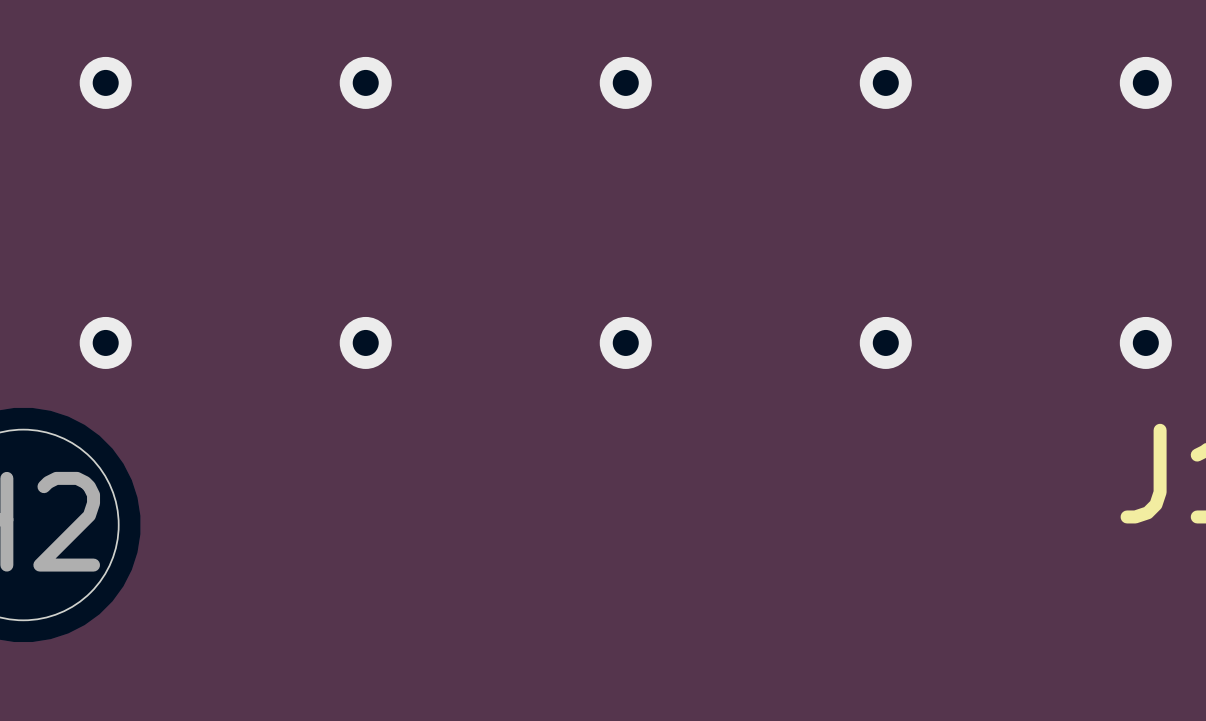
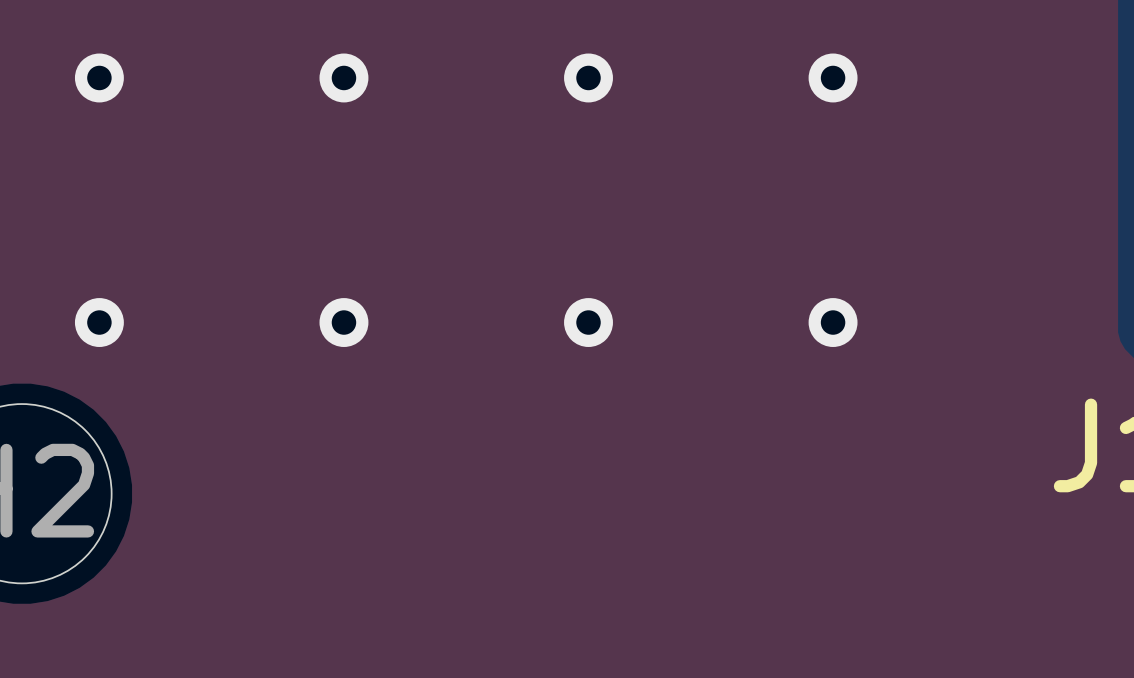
via: (1145, 82) -> none
via: (1145, 342) -> none

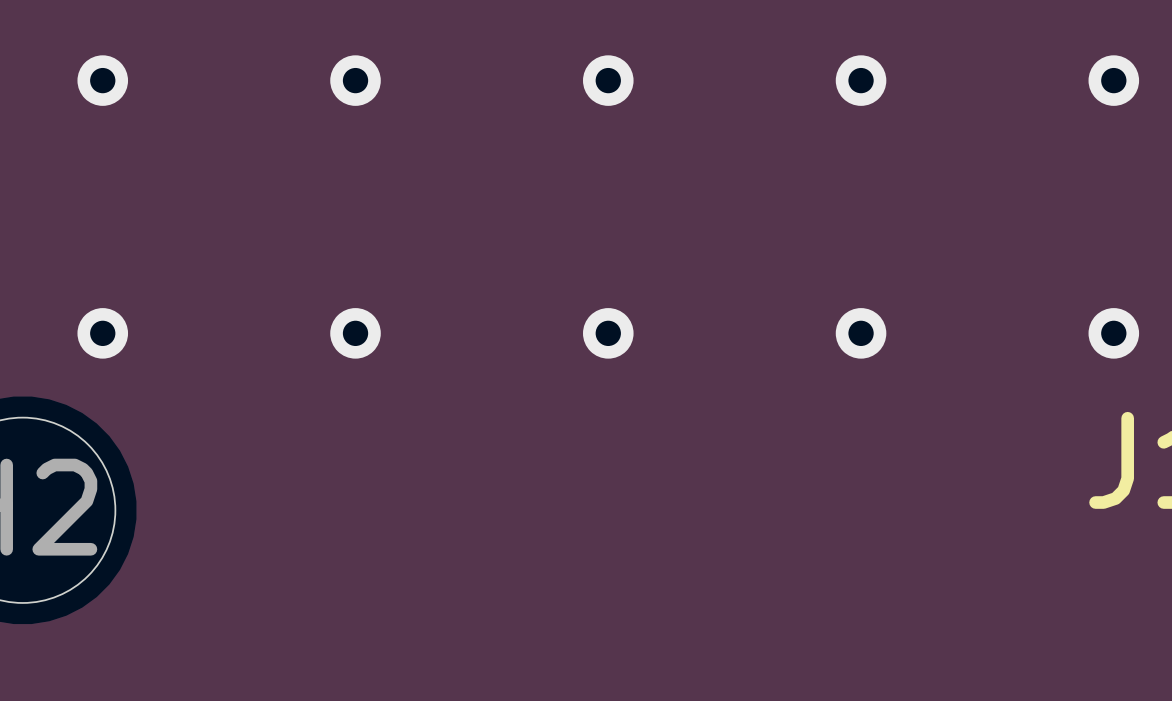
via: none -> (1113, 80)
via: none -> (1113, 333)

